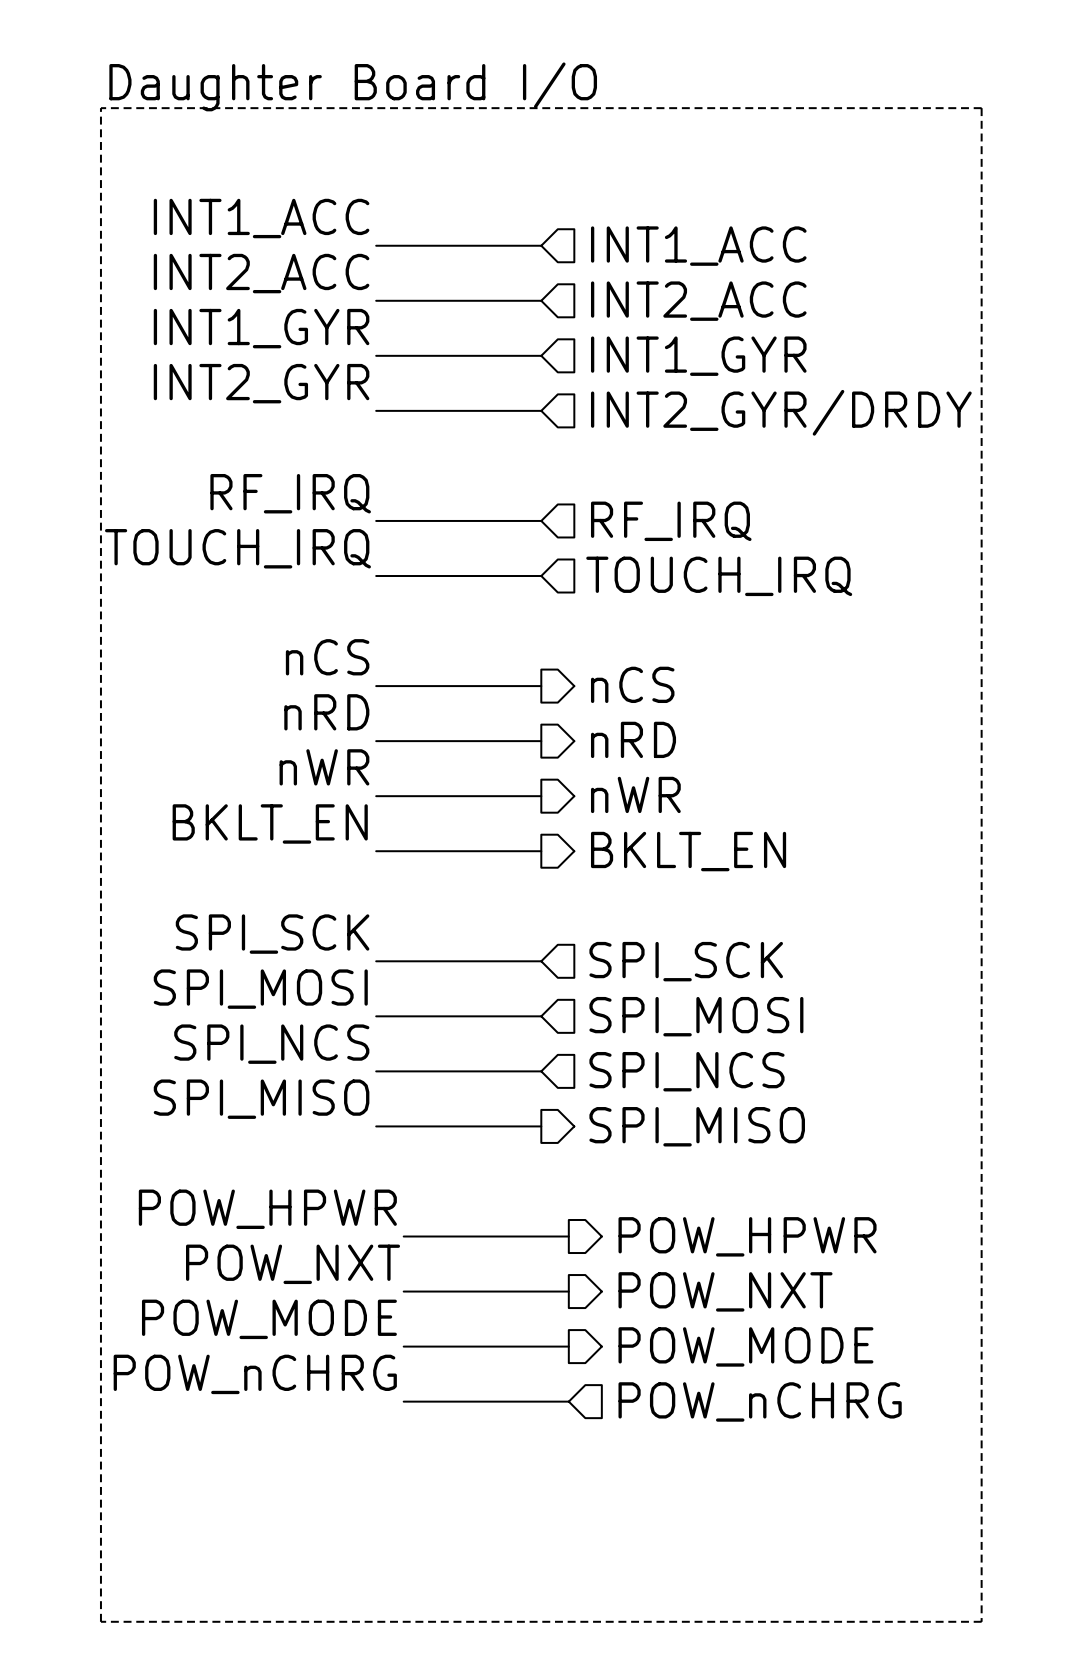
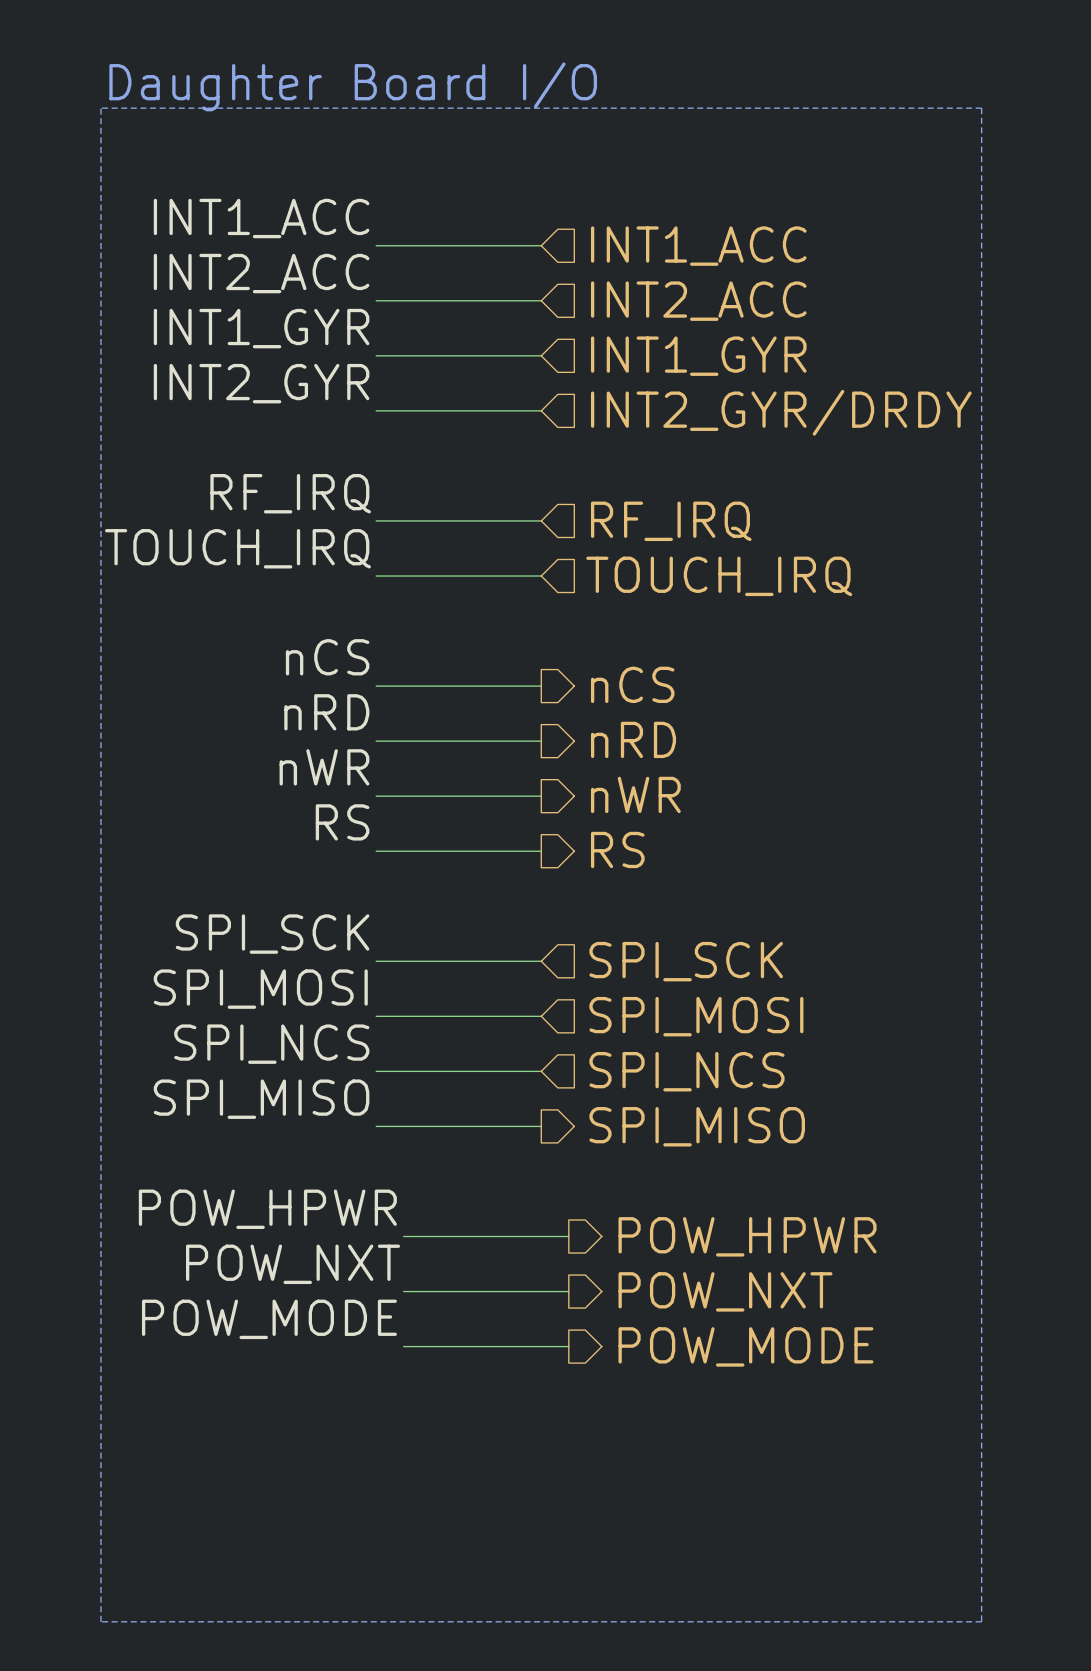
label: BKLT_EN (270, 823) -> RS (342, 822)
hierarchical label: BKLT_EN (688, 851) -> RS (617, 849)
label: POW_nCHRG (255, 1374) -> none
wire: (403, 1401) (568, 1401) -> none
hierarchical label: POW_nCHRG (760, 1401) -> none

